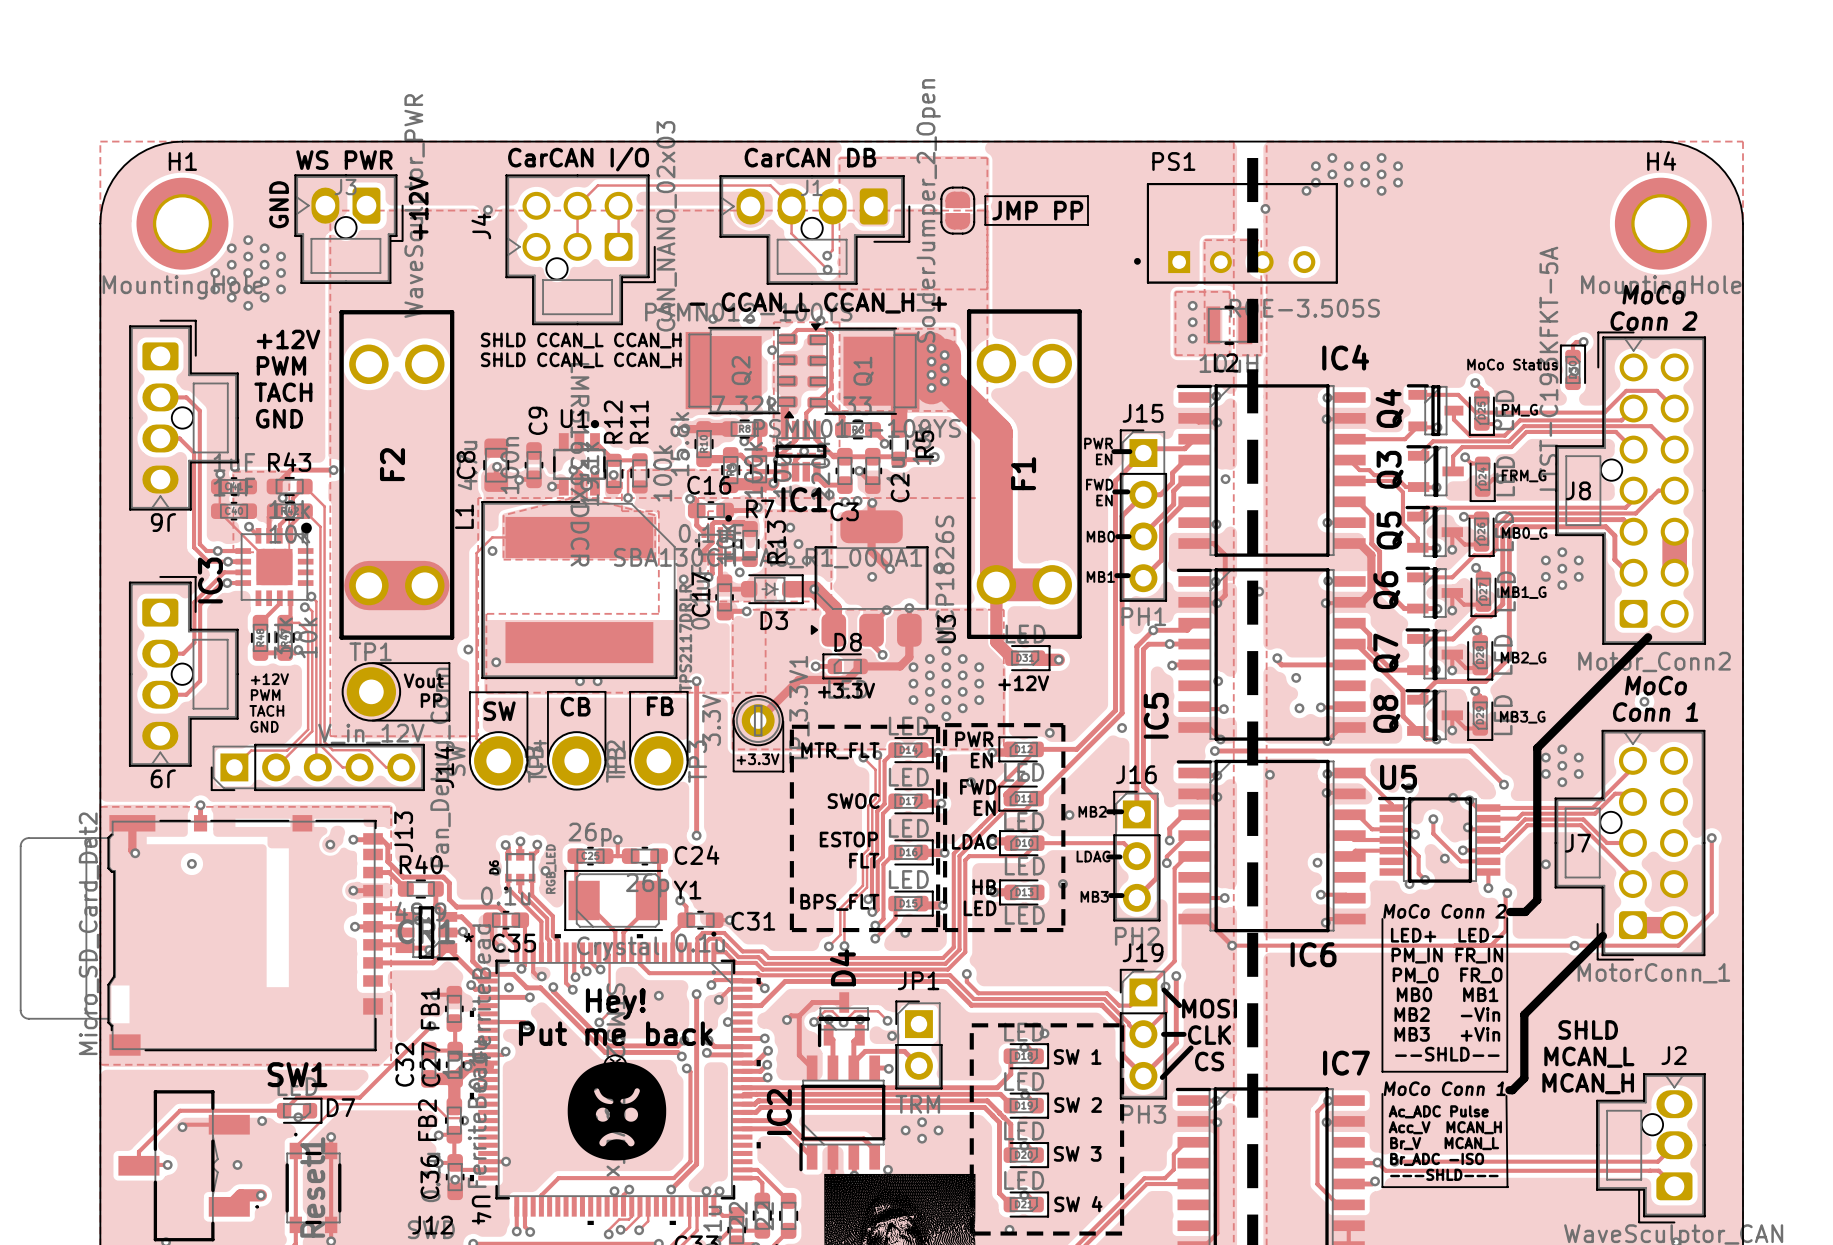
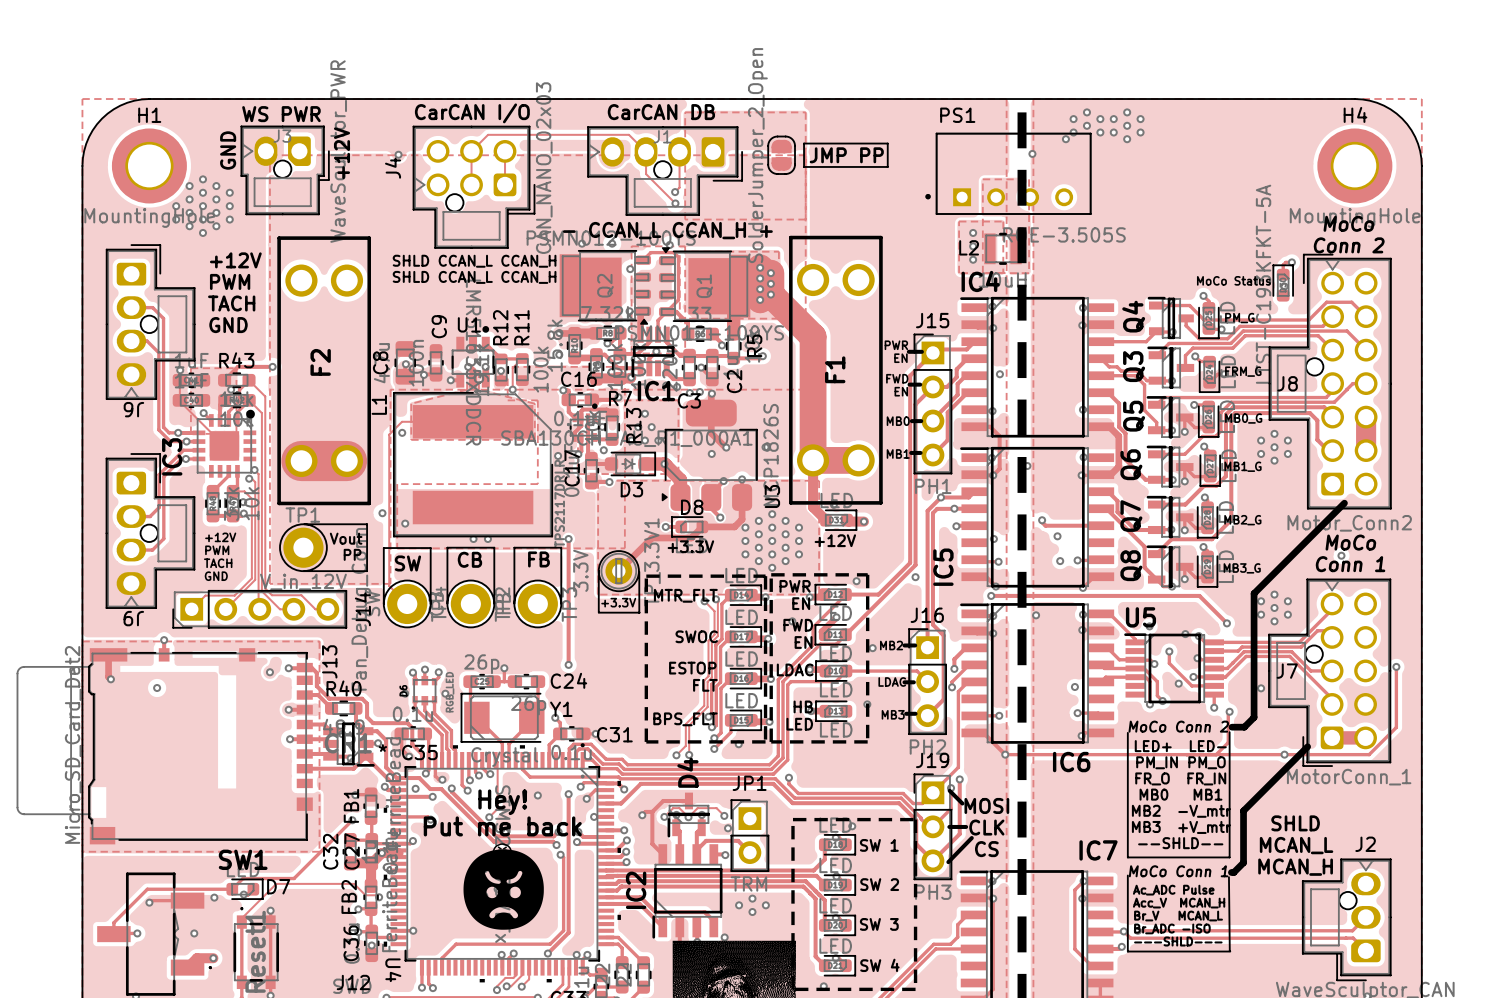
IC4 name position: IC4 (1345, 357) -> IC4 (980, 281)
L2 name position: L2 (1225, 362) -> L2 (969, 247)
text: PM_IN FR_IN (1447, 955) -> PM_IN PM_O (1180, 762)
text: PM_O FR_O (1447, 975) -> FR_O FR_IN (1180, 778)
text: MB2 -Vin (1447, 1014) -> MB2 -V_mtr (1181, 811)
text: MB3 +Vin (1447, 1034) -> MB3 +V_mtr (1181, 827)

